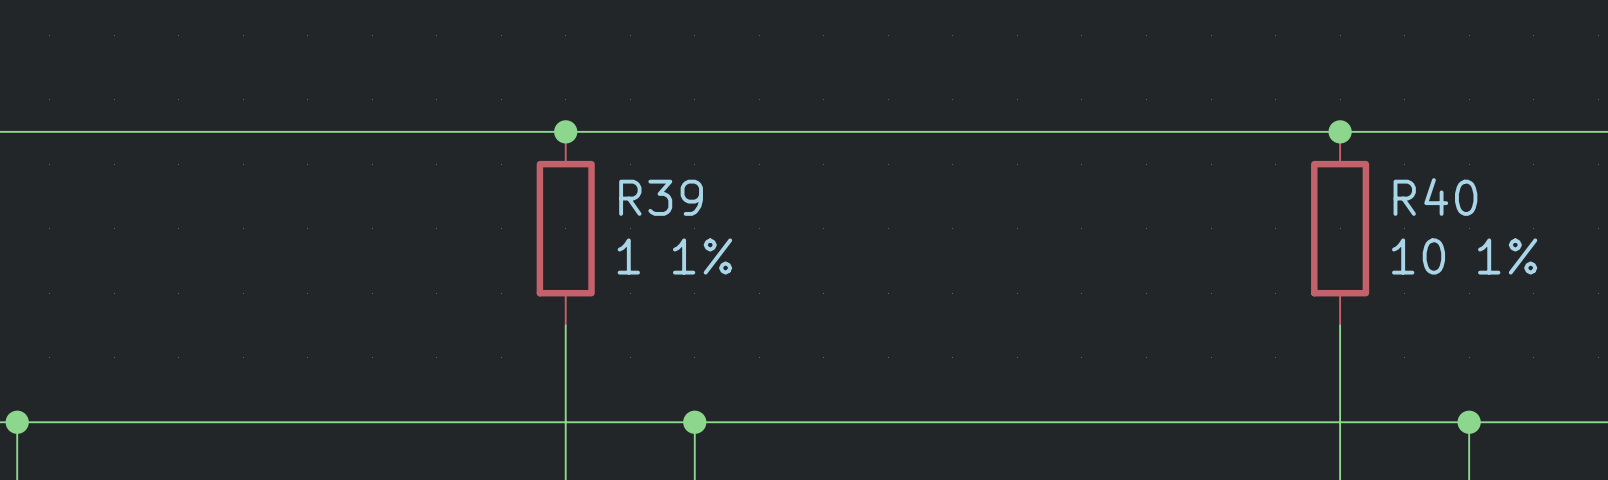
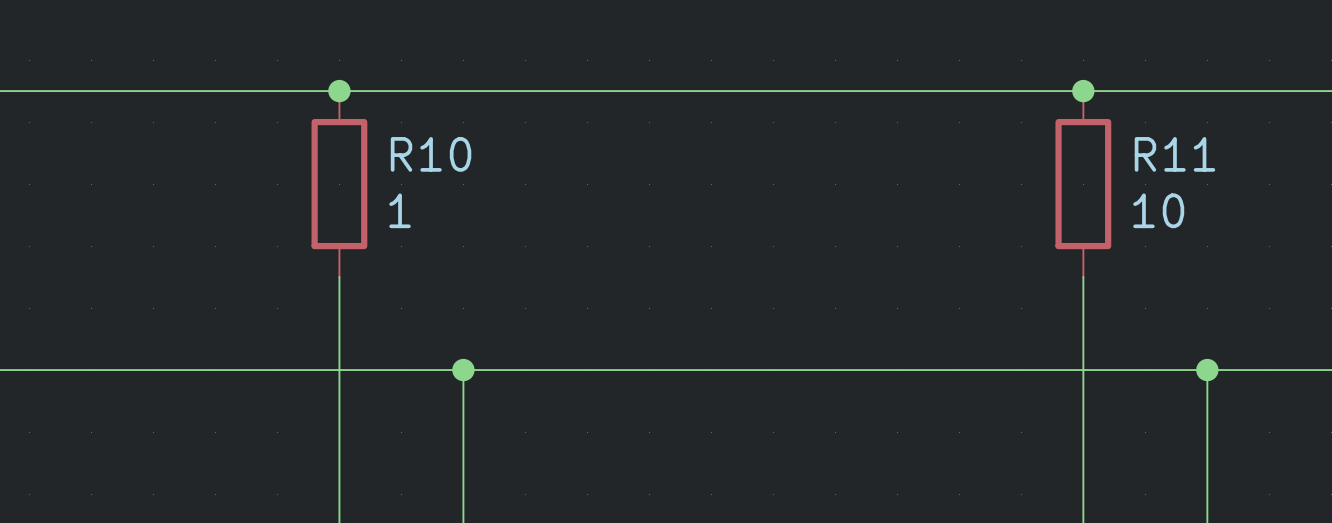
R39 name: R39 (661, 197) -> R10 (431, 154)
R40 name: R40 (1435, 197) -> R11 (1174, 154)
R39 value: 1 1% (674, 256) -> 1 (400, 210)
R40 value: 10 1% (1464, 256) -> 10 (1158, 210)

